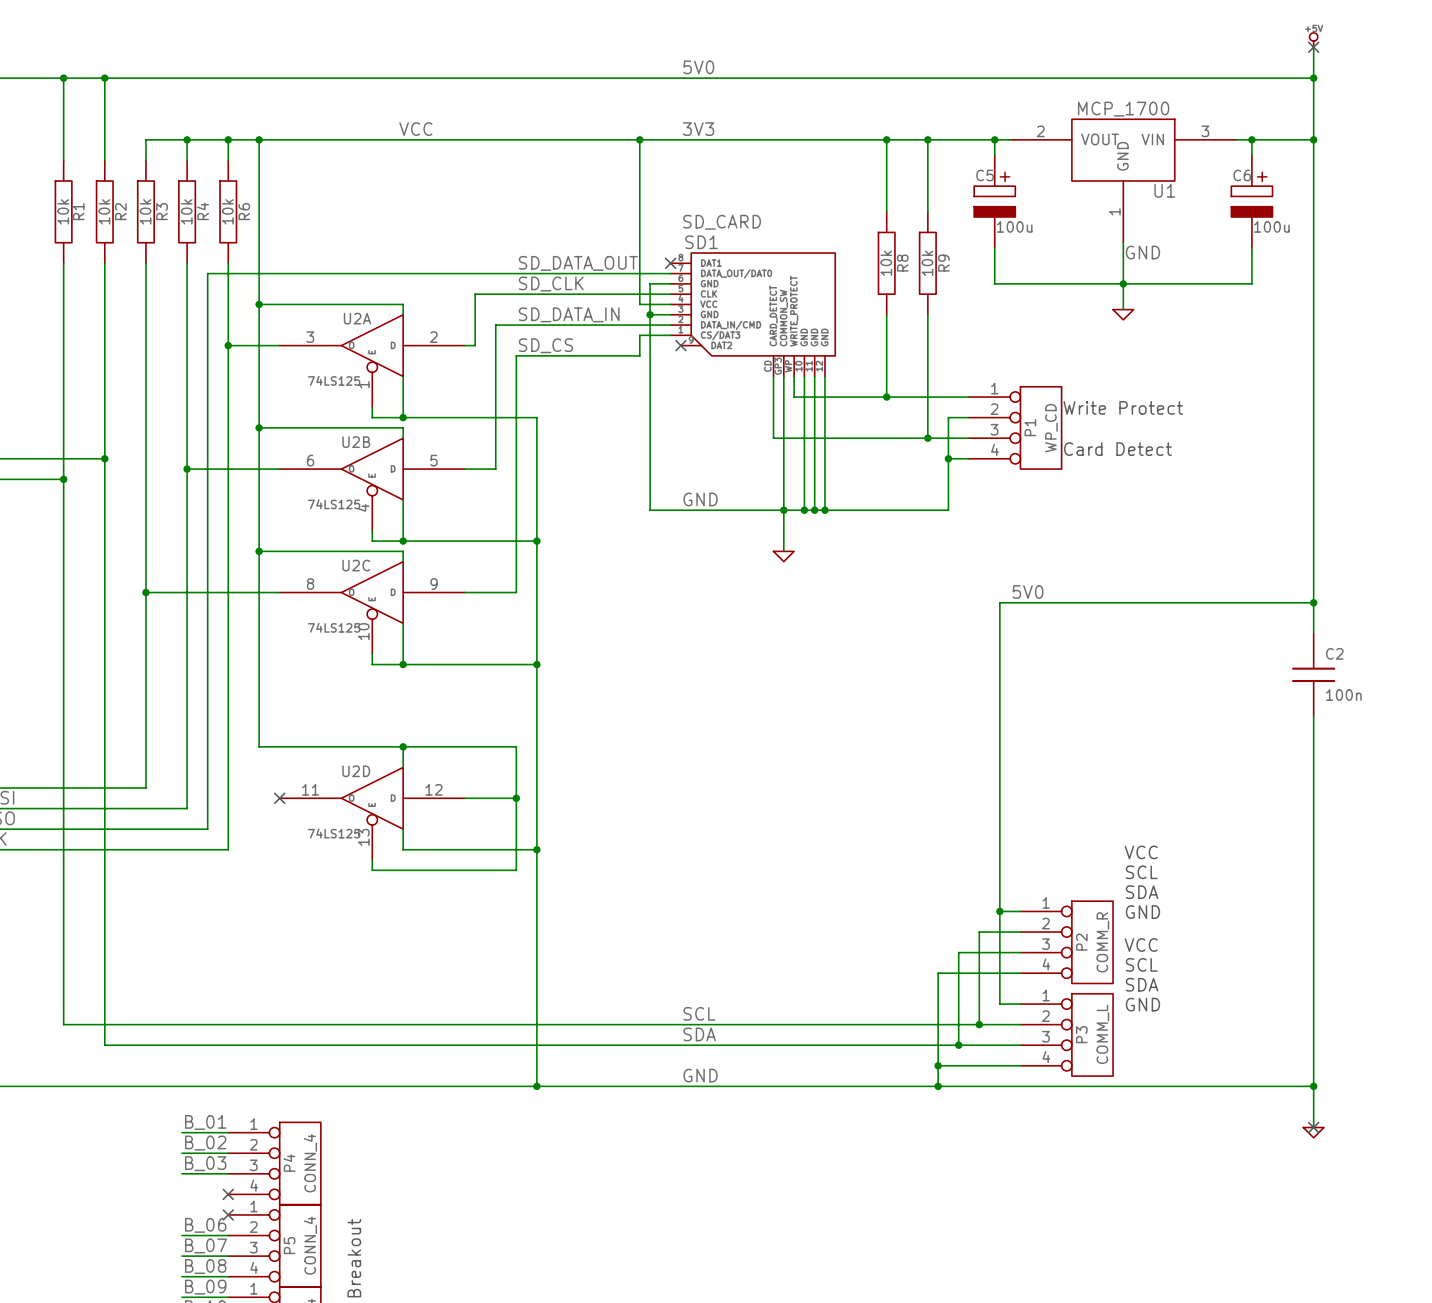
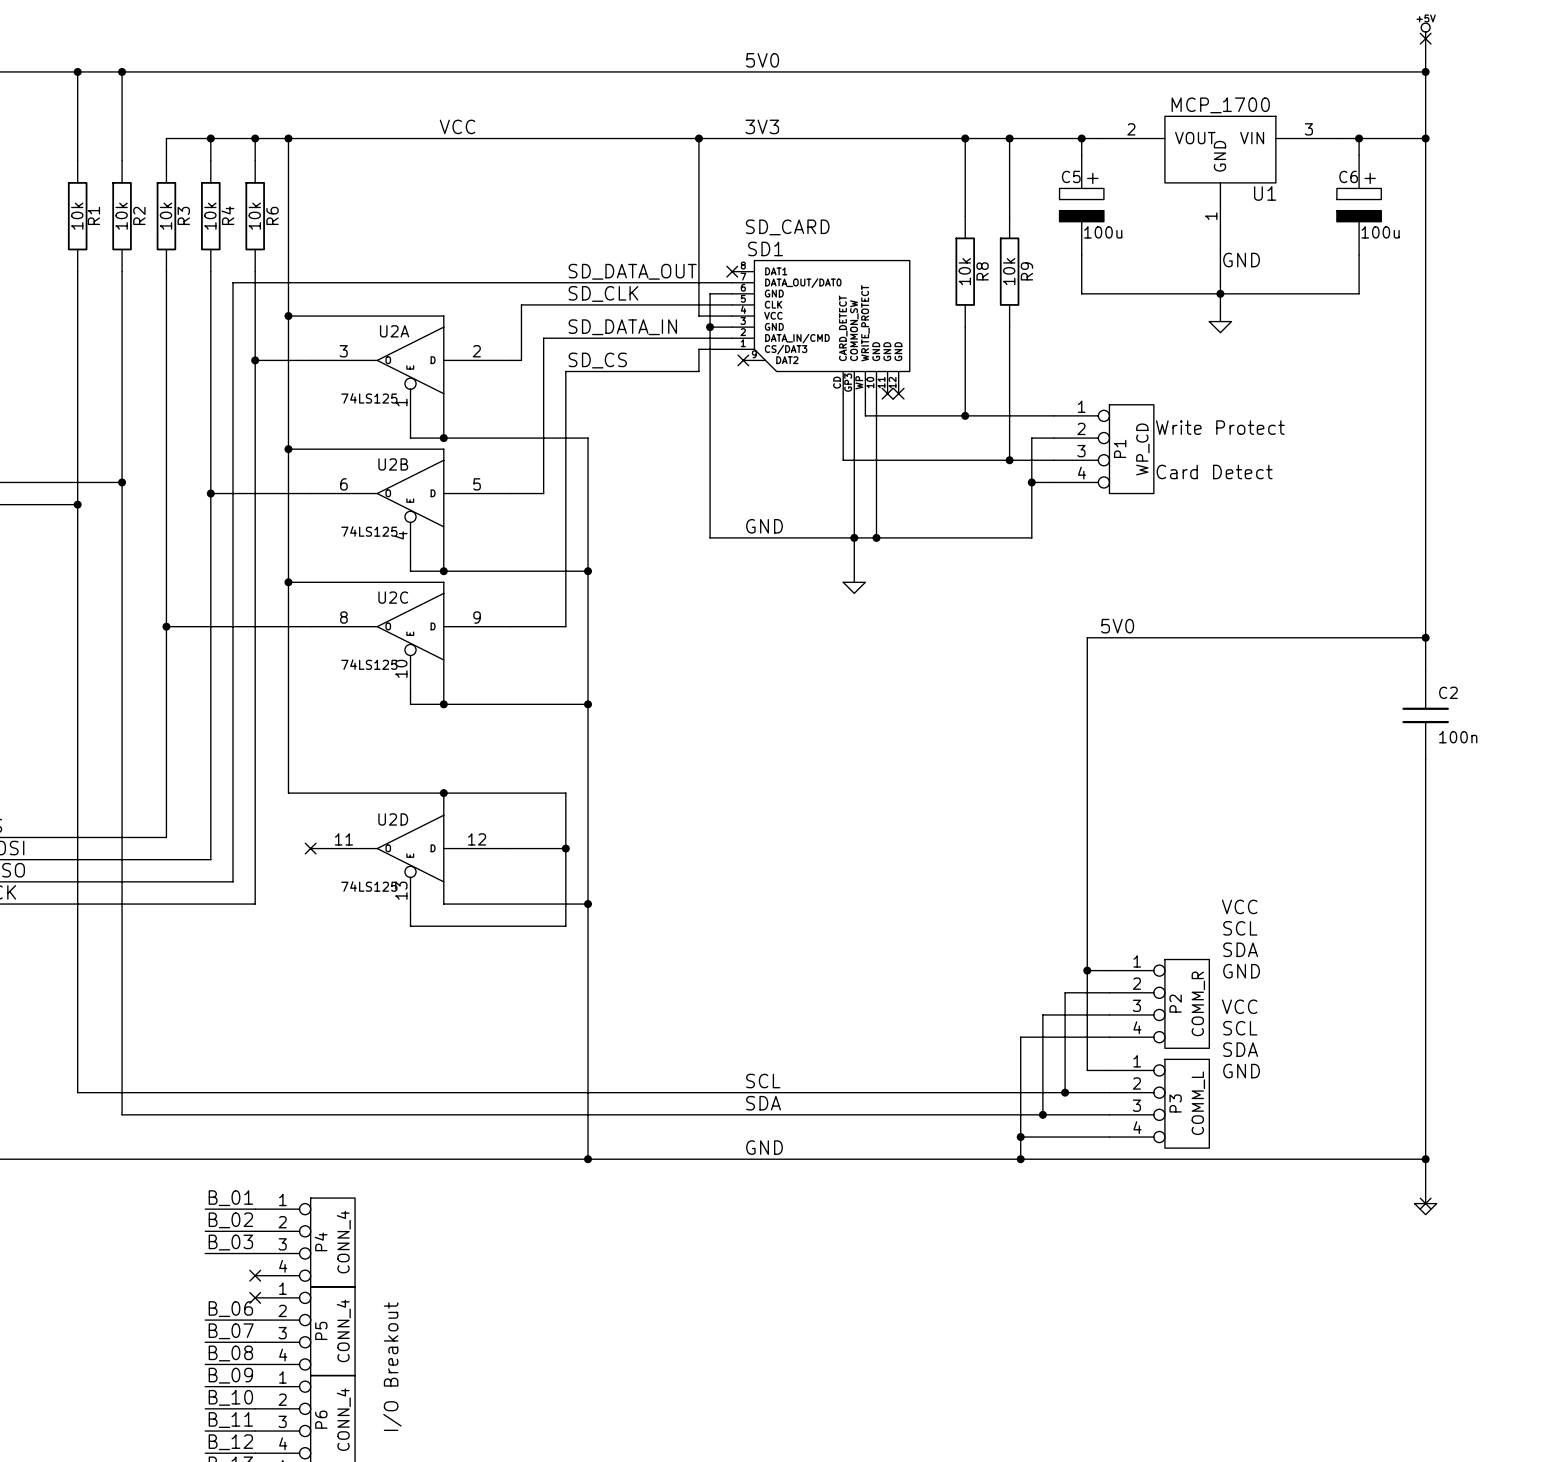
wire: (814, 376) (814, 510) -> none
no-connect mark: none -> (887, 393)
wire: (824, 376) (824, 510) -> none
no-connect mark: none -> (898, 393)
junction: (814, 510) -> none
junction: (824, 510) -> none

